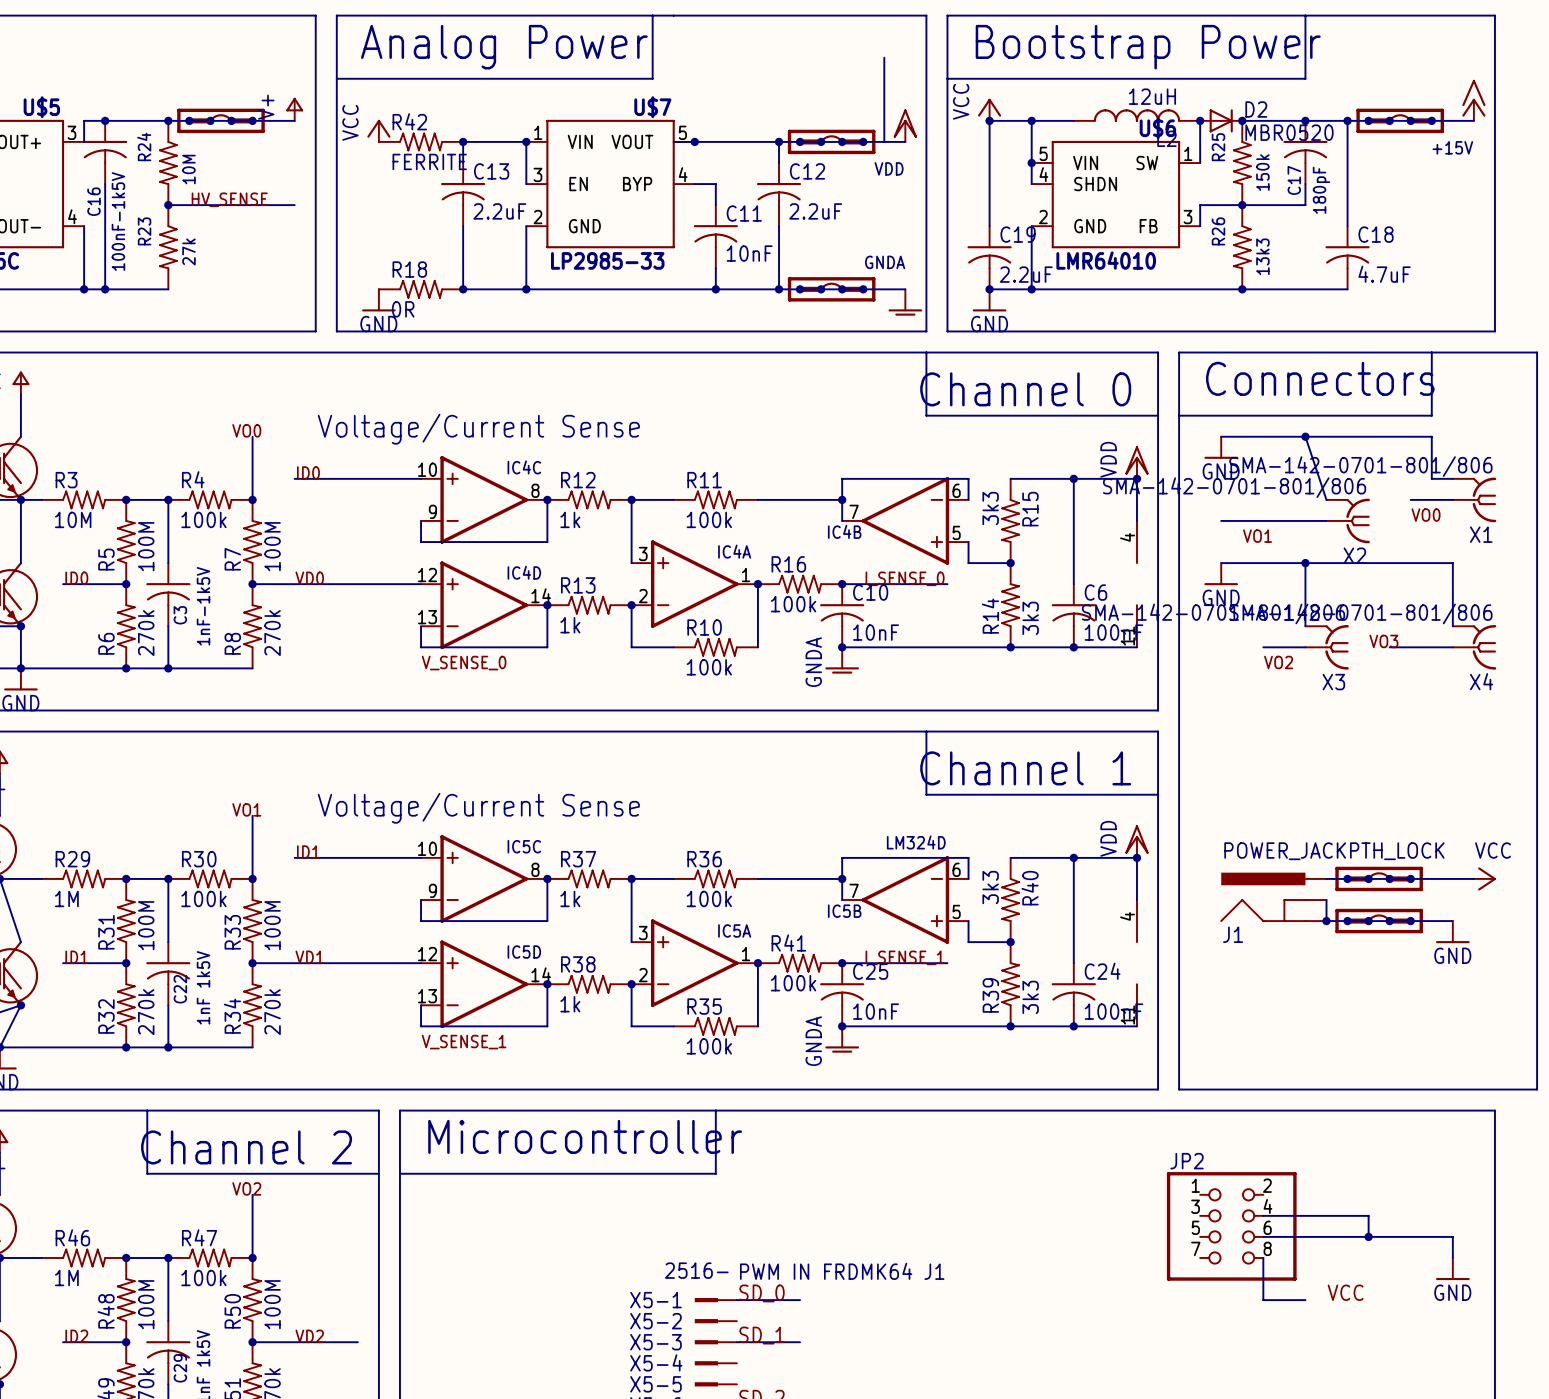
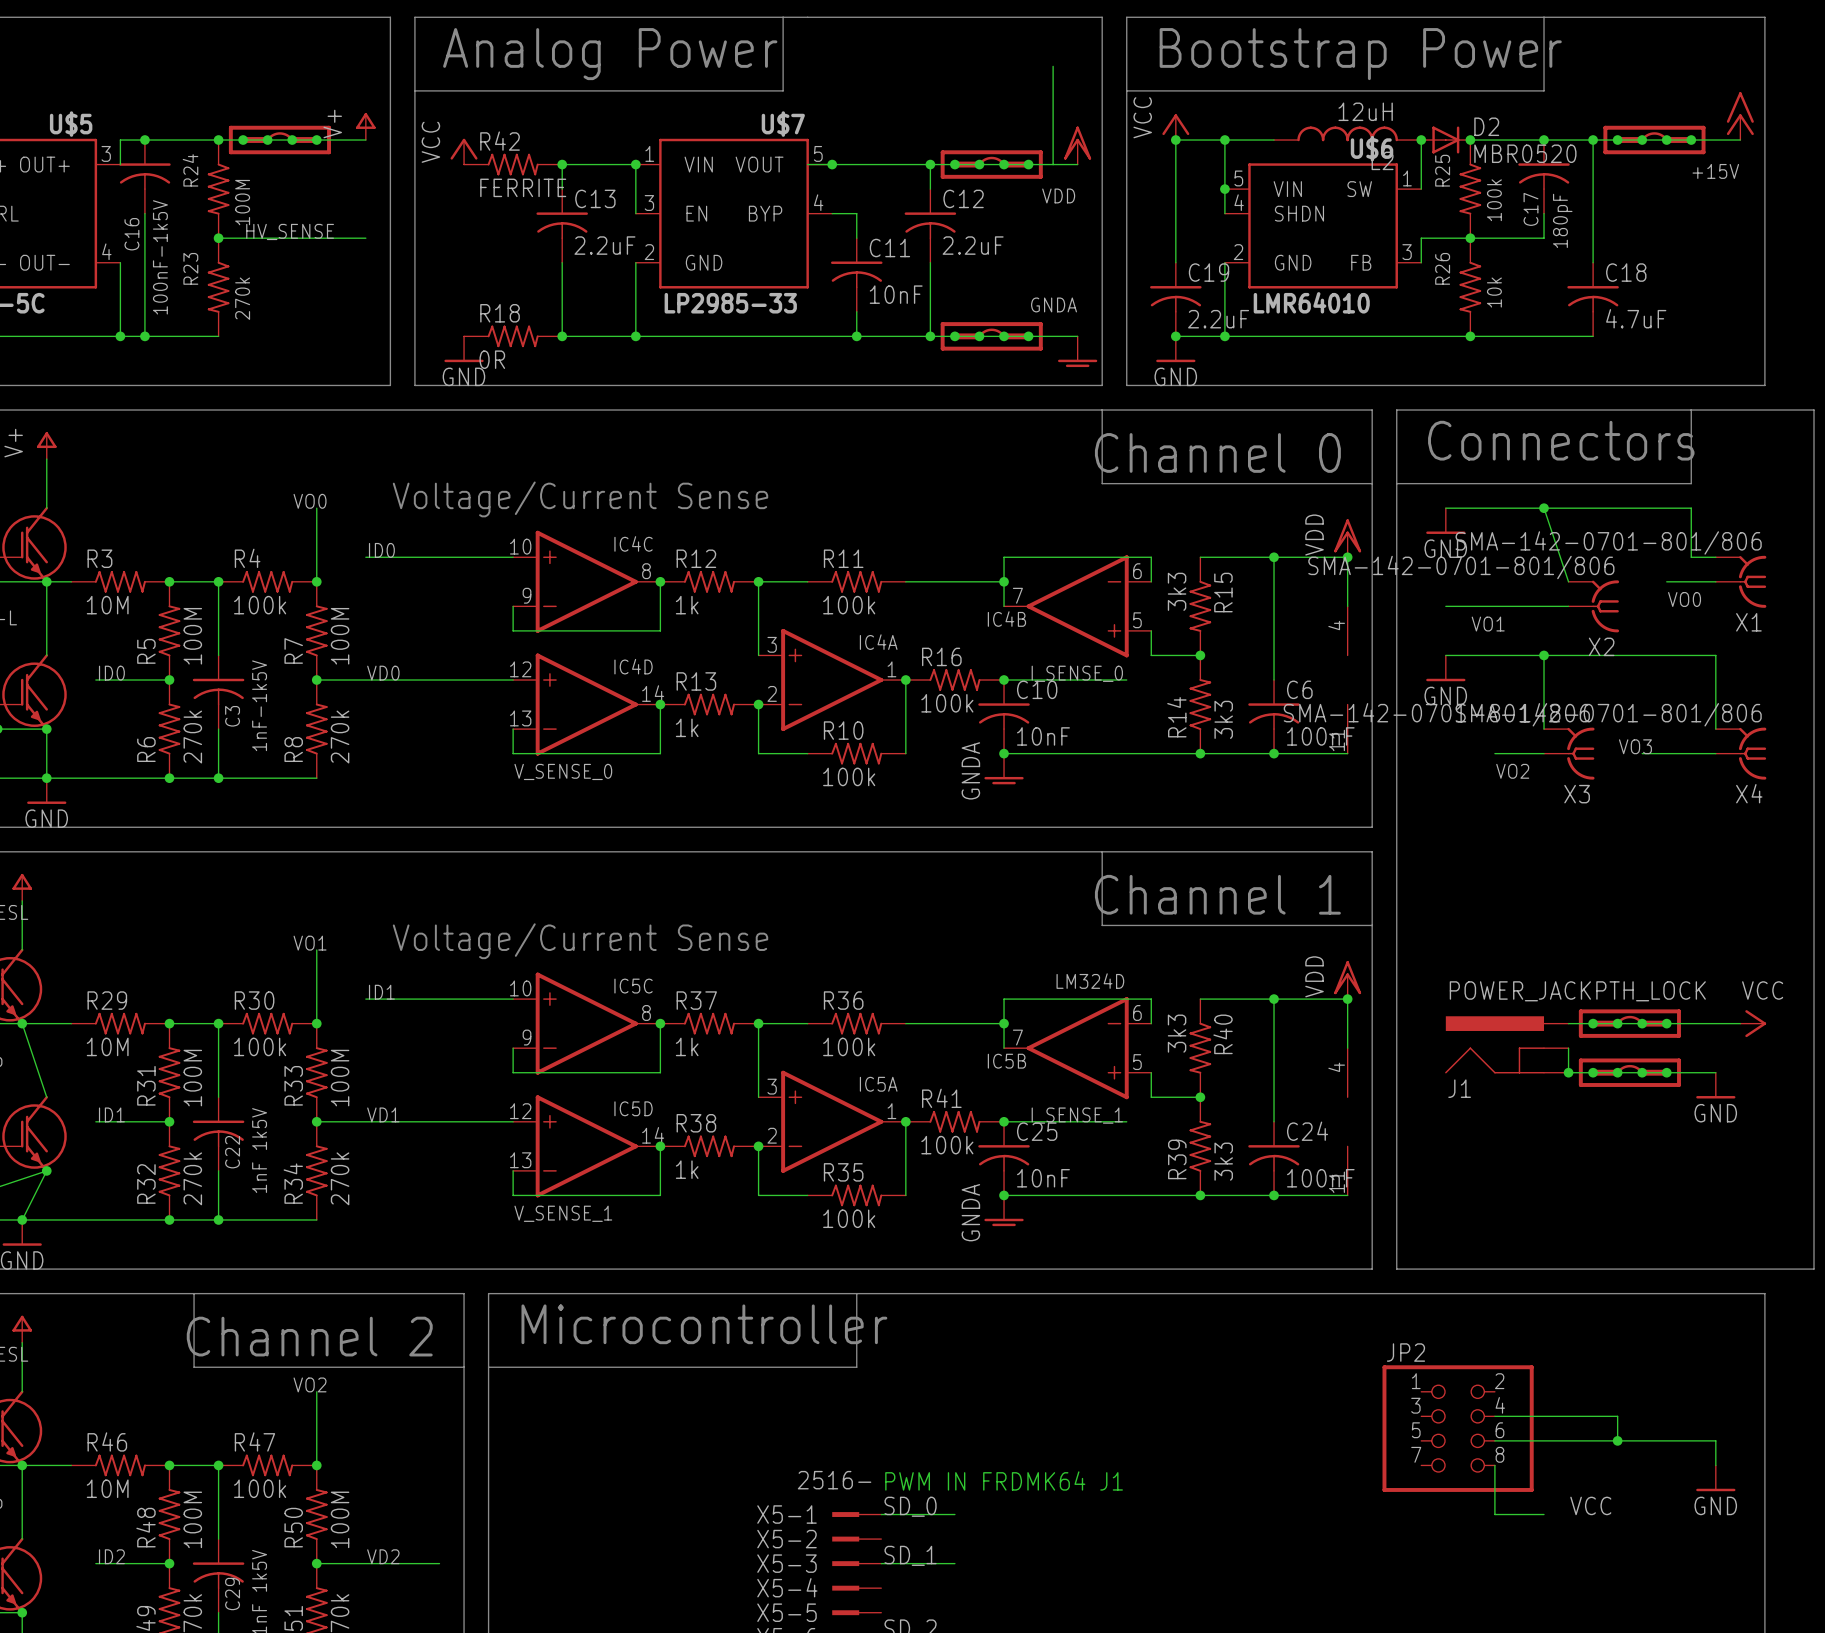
R24 value: 10M (188, 169) -> 100M (242, 202)
R25 value: 150k (1262, 172) -> 100k (1494, 200)
R23 value: 27k (188, 251) -> 270k (242, 298)
R26 value: 13k3 (1262, 256) -> 10k (1494, 292)
R29 value: 1M (66, 898) -> 10M (107, 1046)
R46 value: 1M (66, 1277) -> 10M (107, 1488)

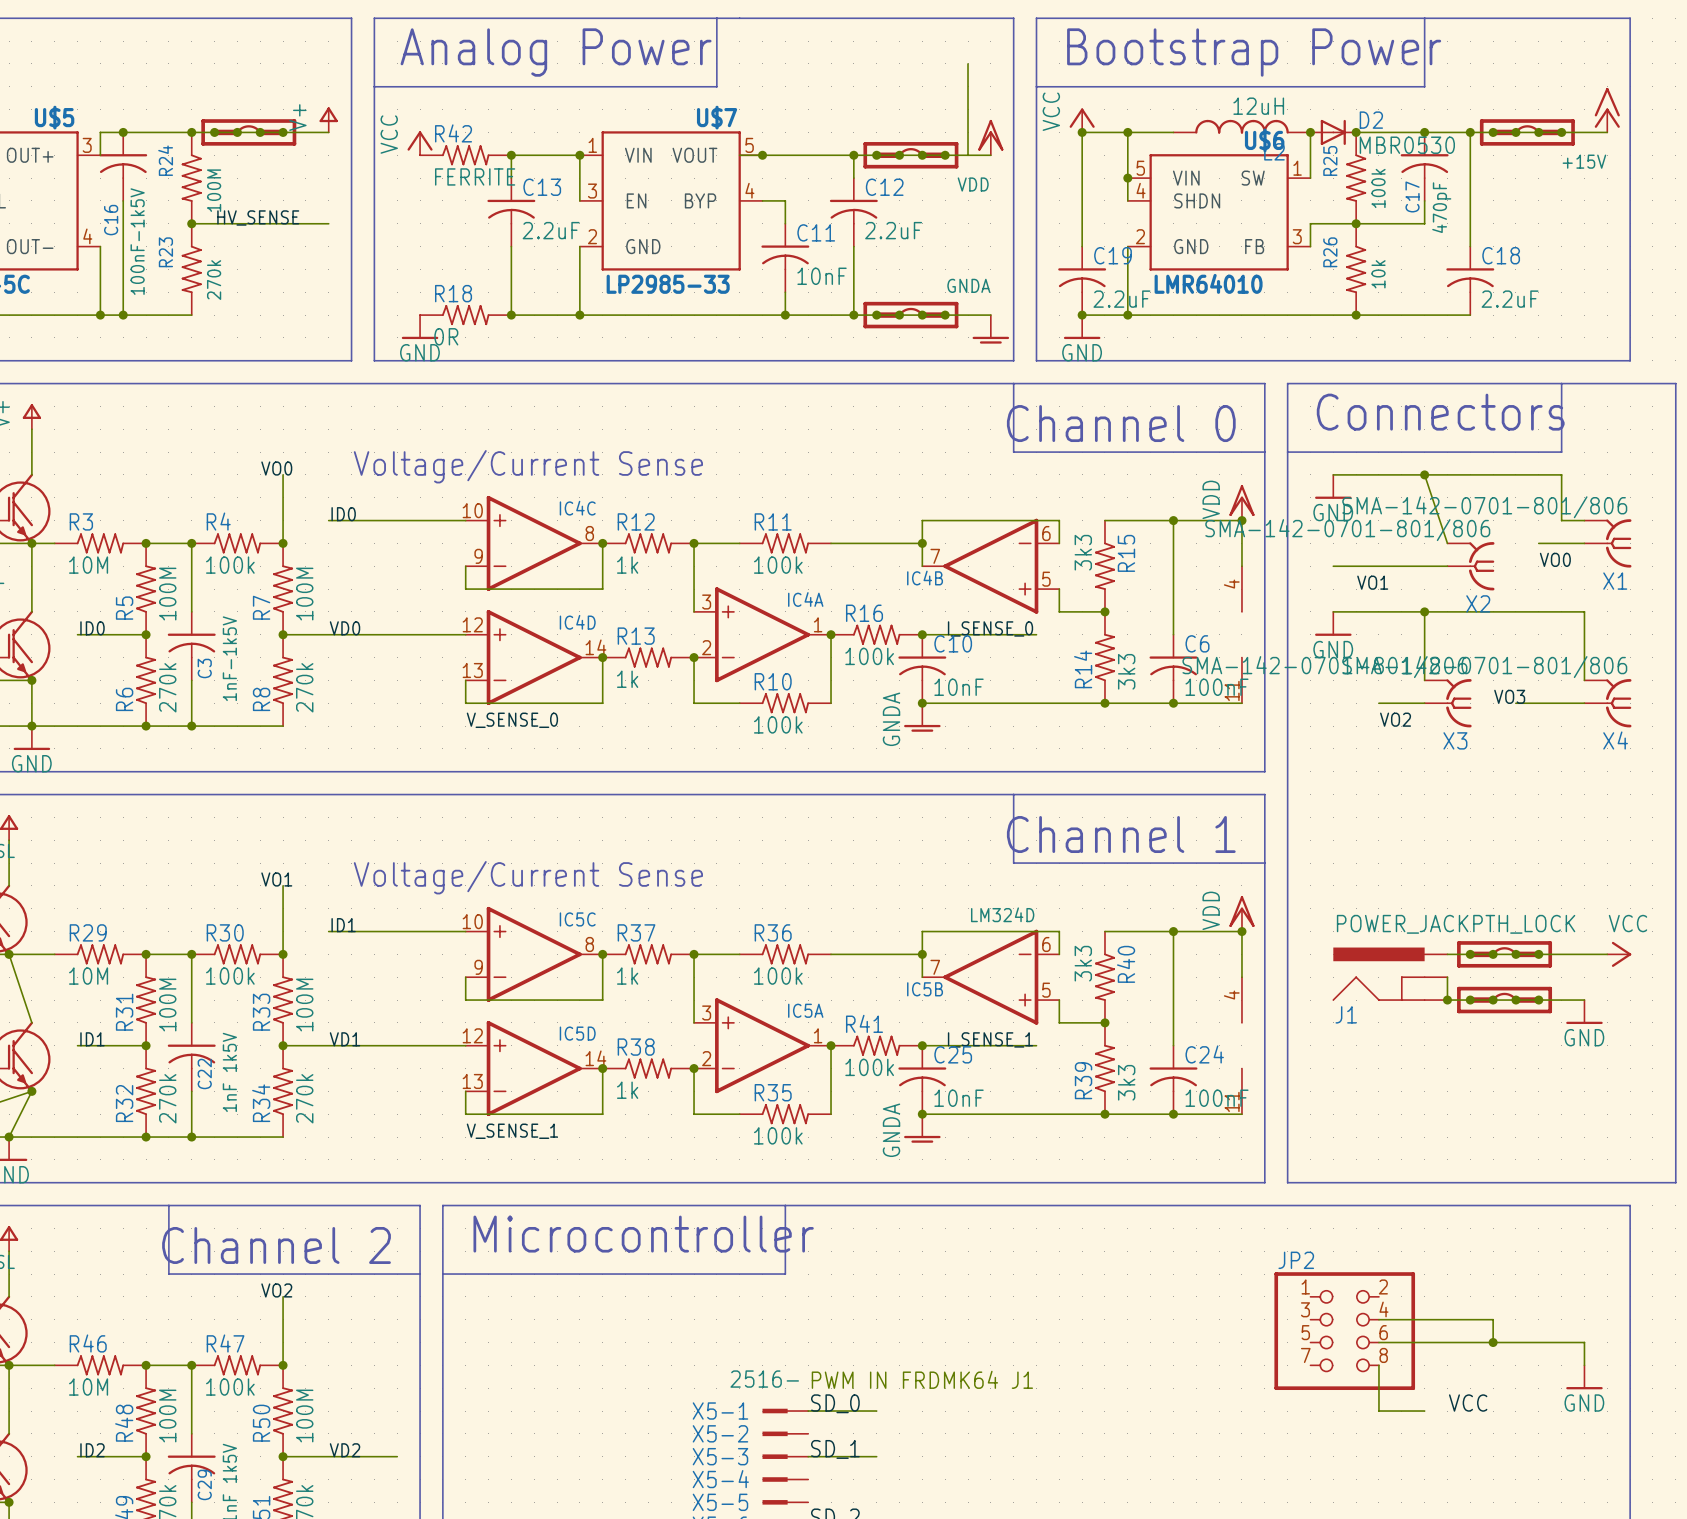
D2 value: MBR0520 (1525, 153) -> MBR0530 (1407, 145)
C17 value: 180pF (1562, 220) -> 470pF (1441, 207)
C18 value: 4.7uF (1636, 318) -> 2.2uF (1510, 299)

